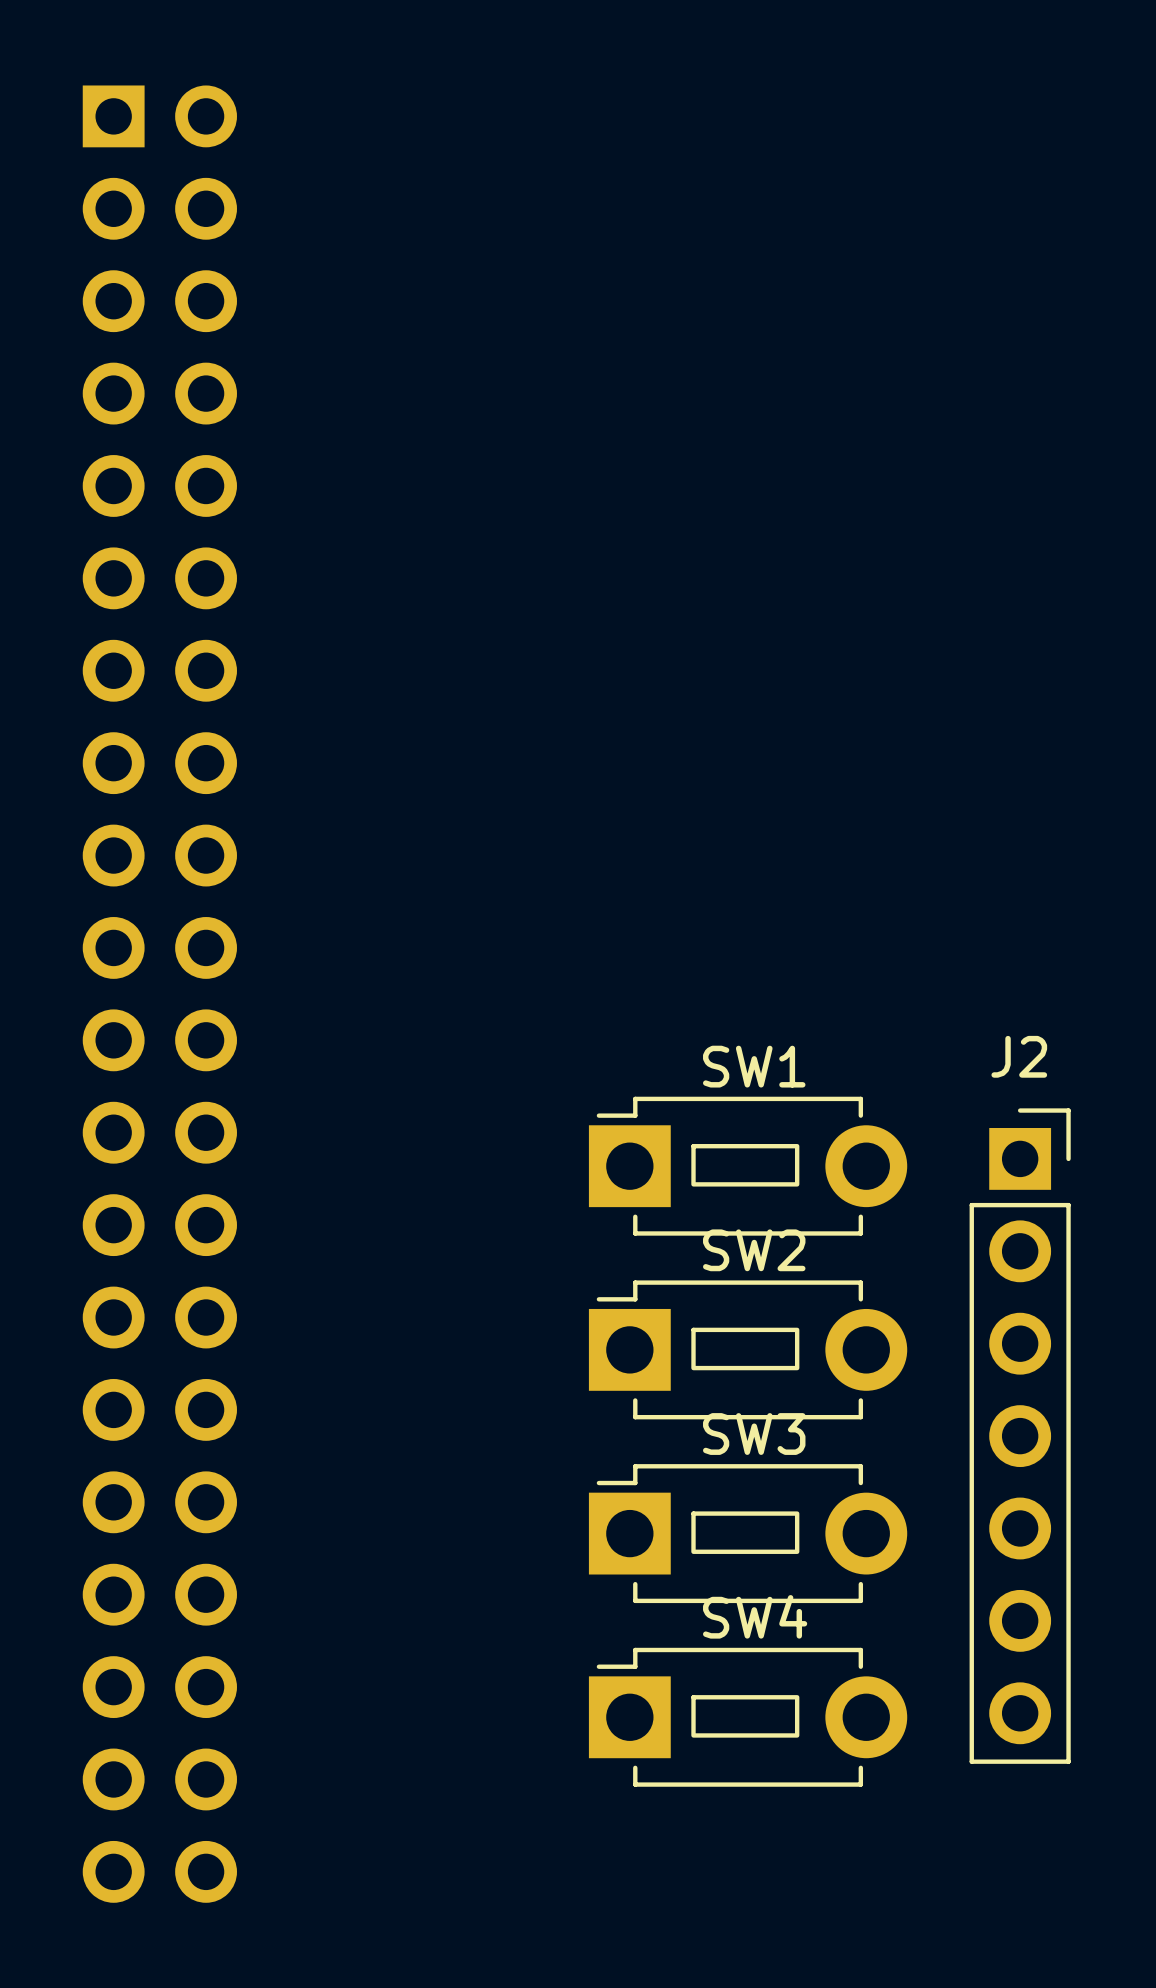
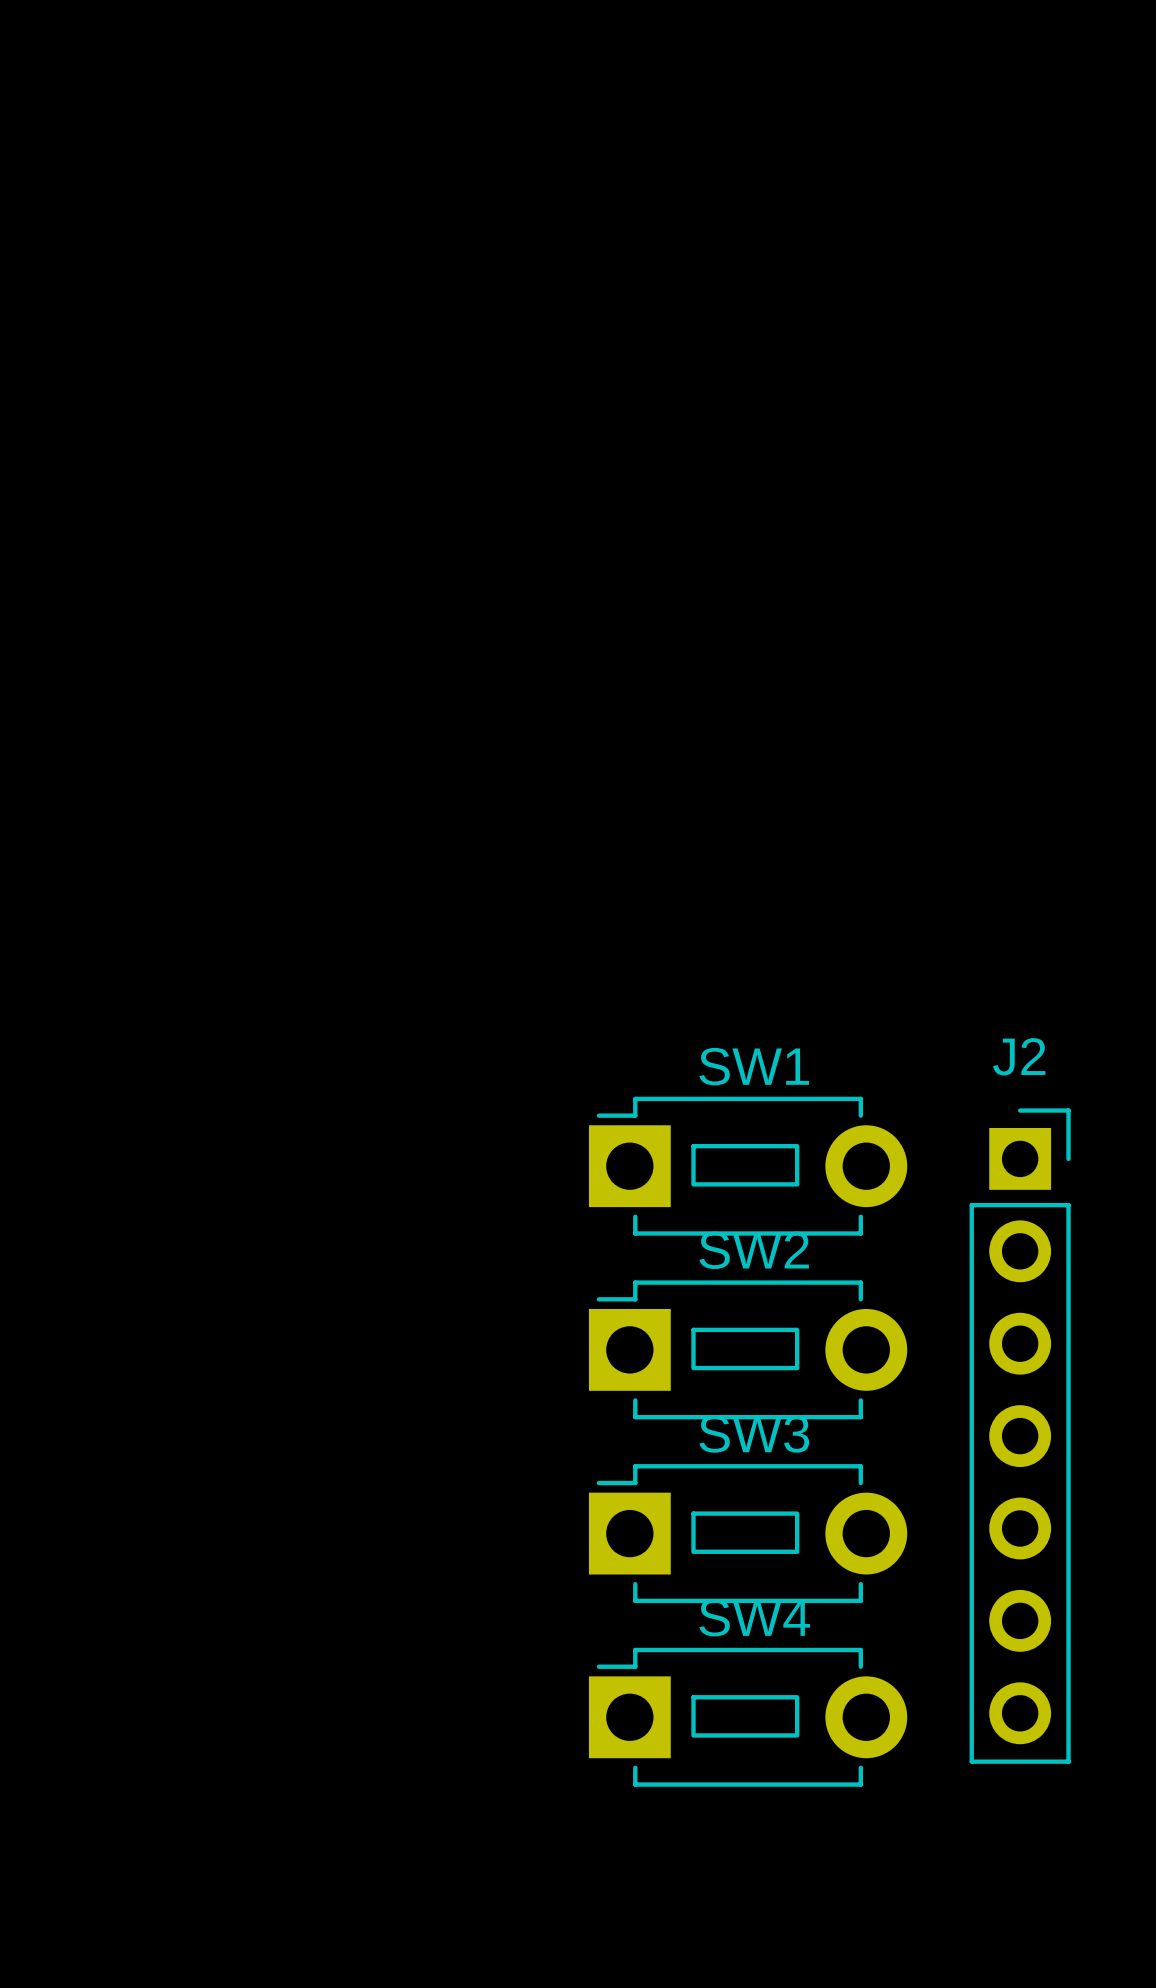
part: (159, 994) -> none

